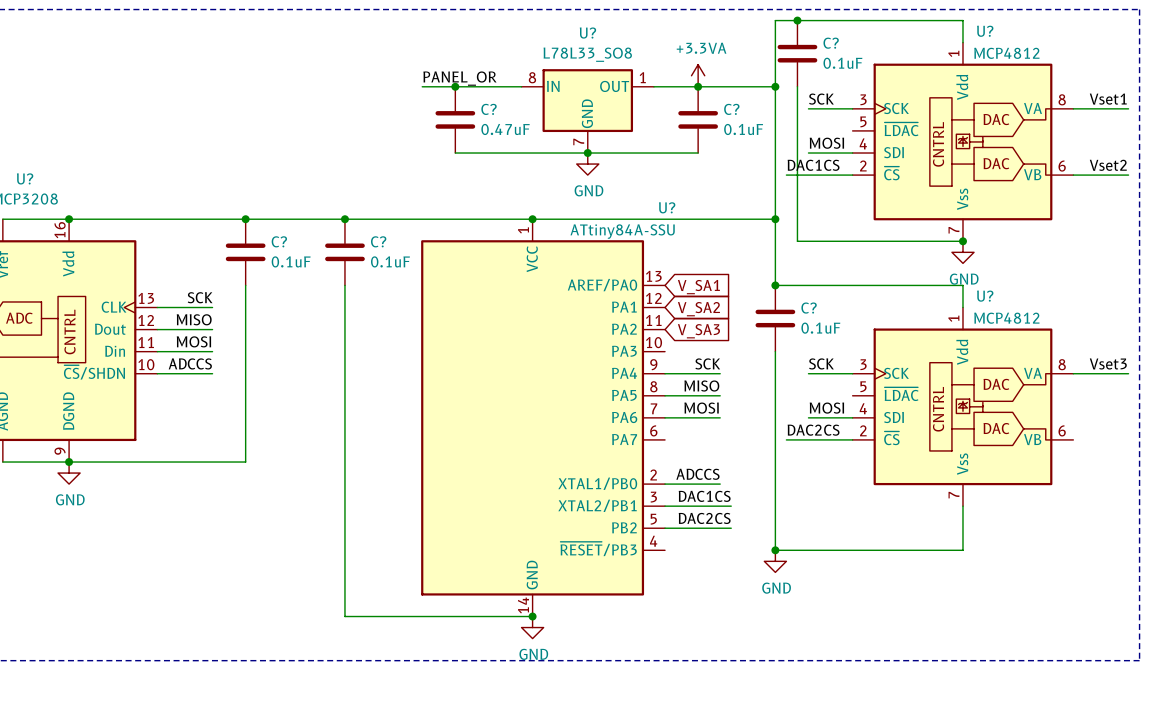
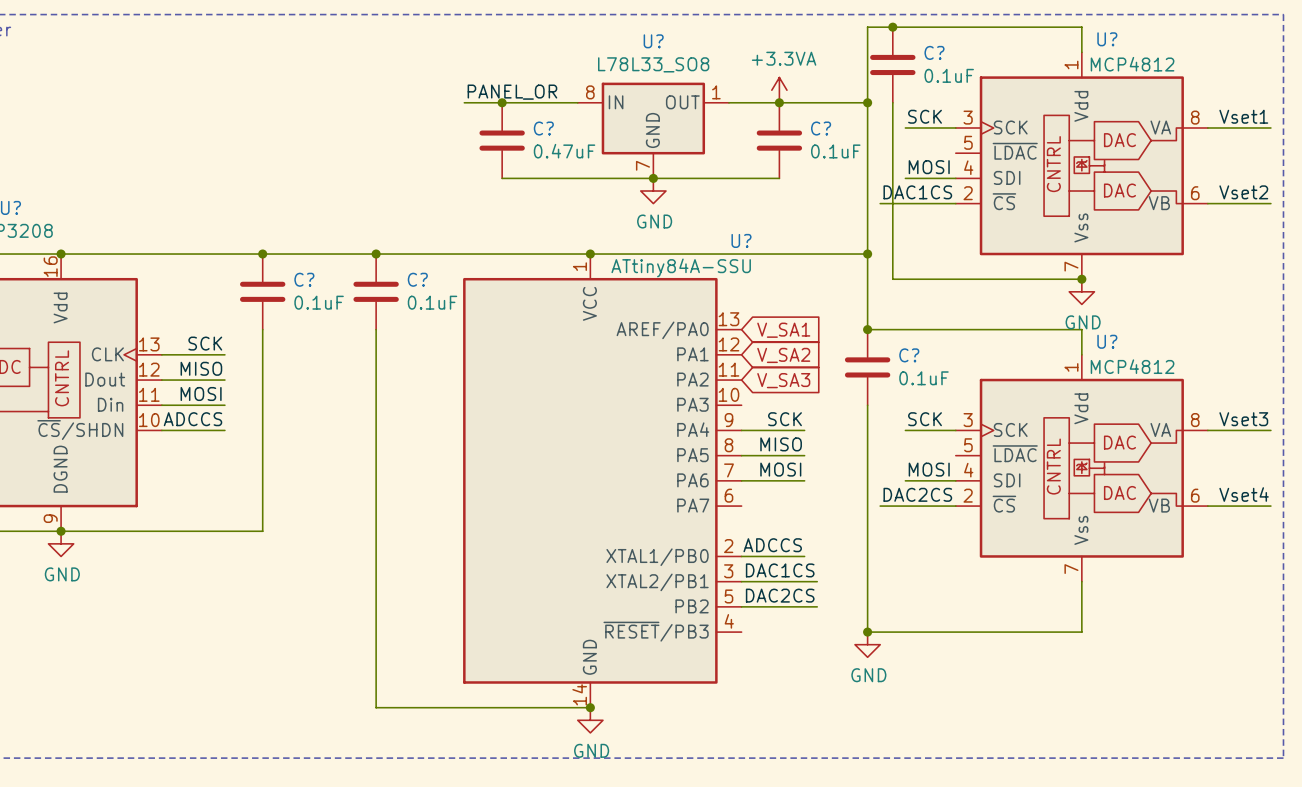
label: none -> Vset4 (1244, 494)
wire: none -> (1207, 506) (1270, 506)

